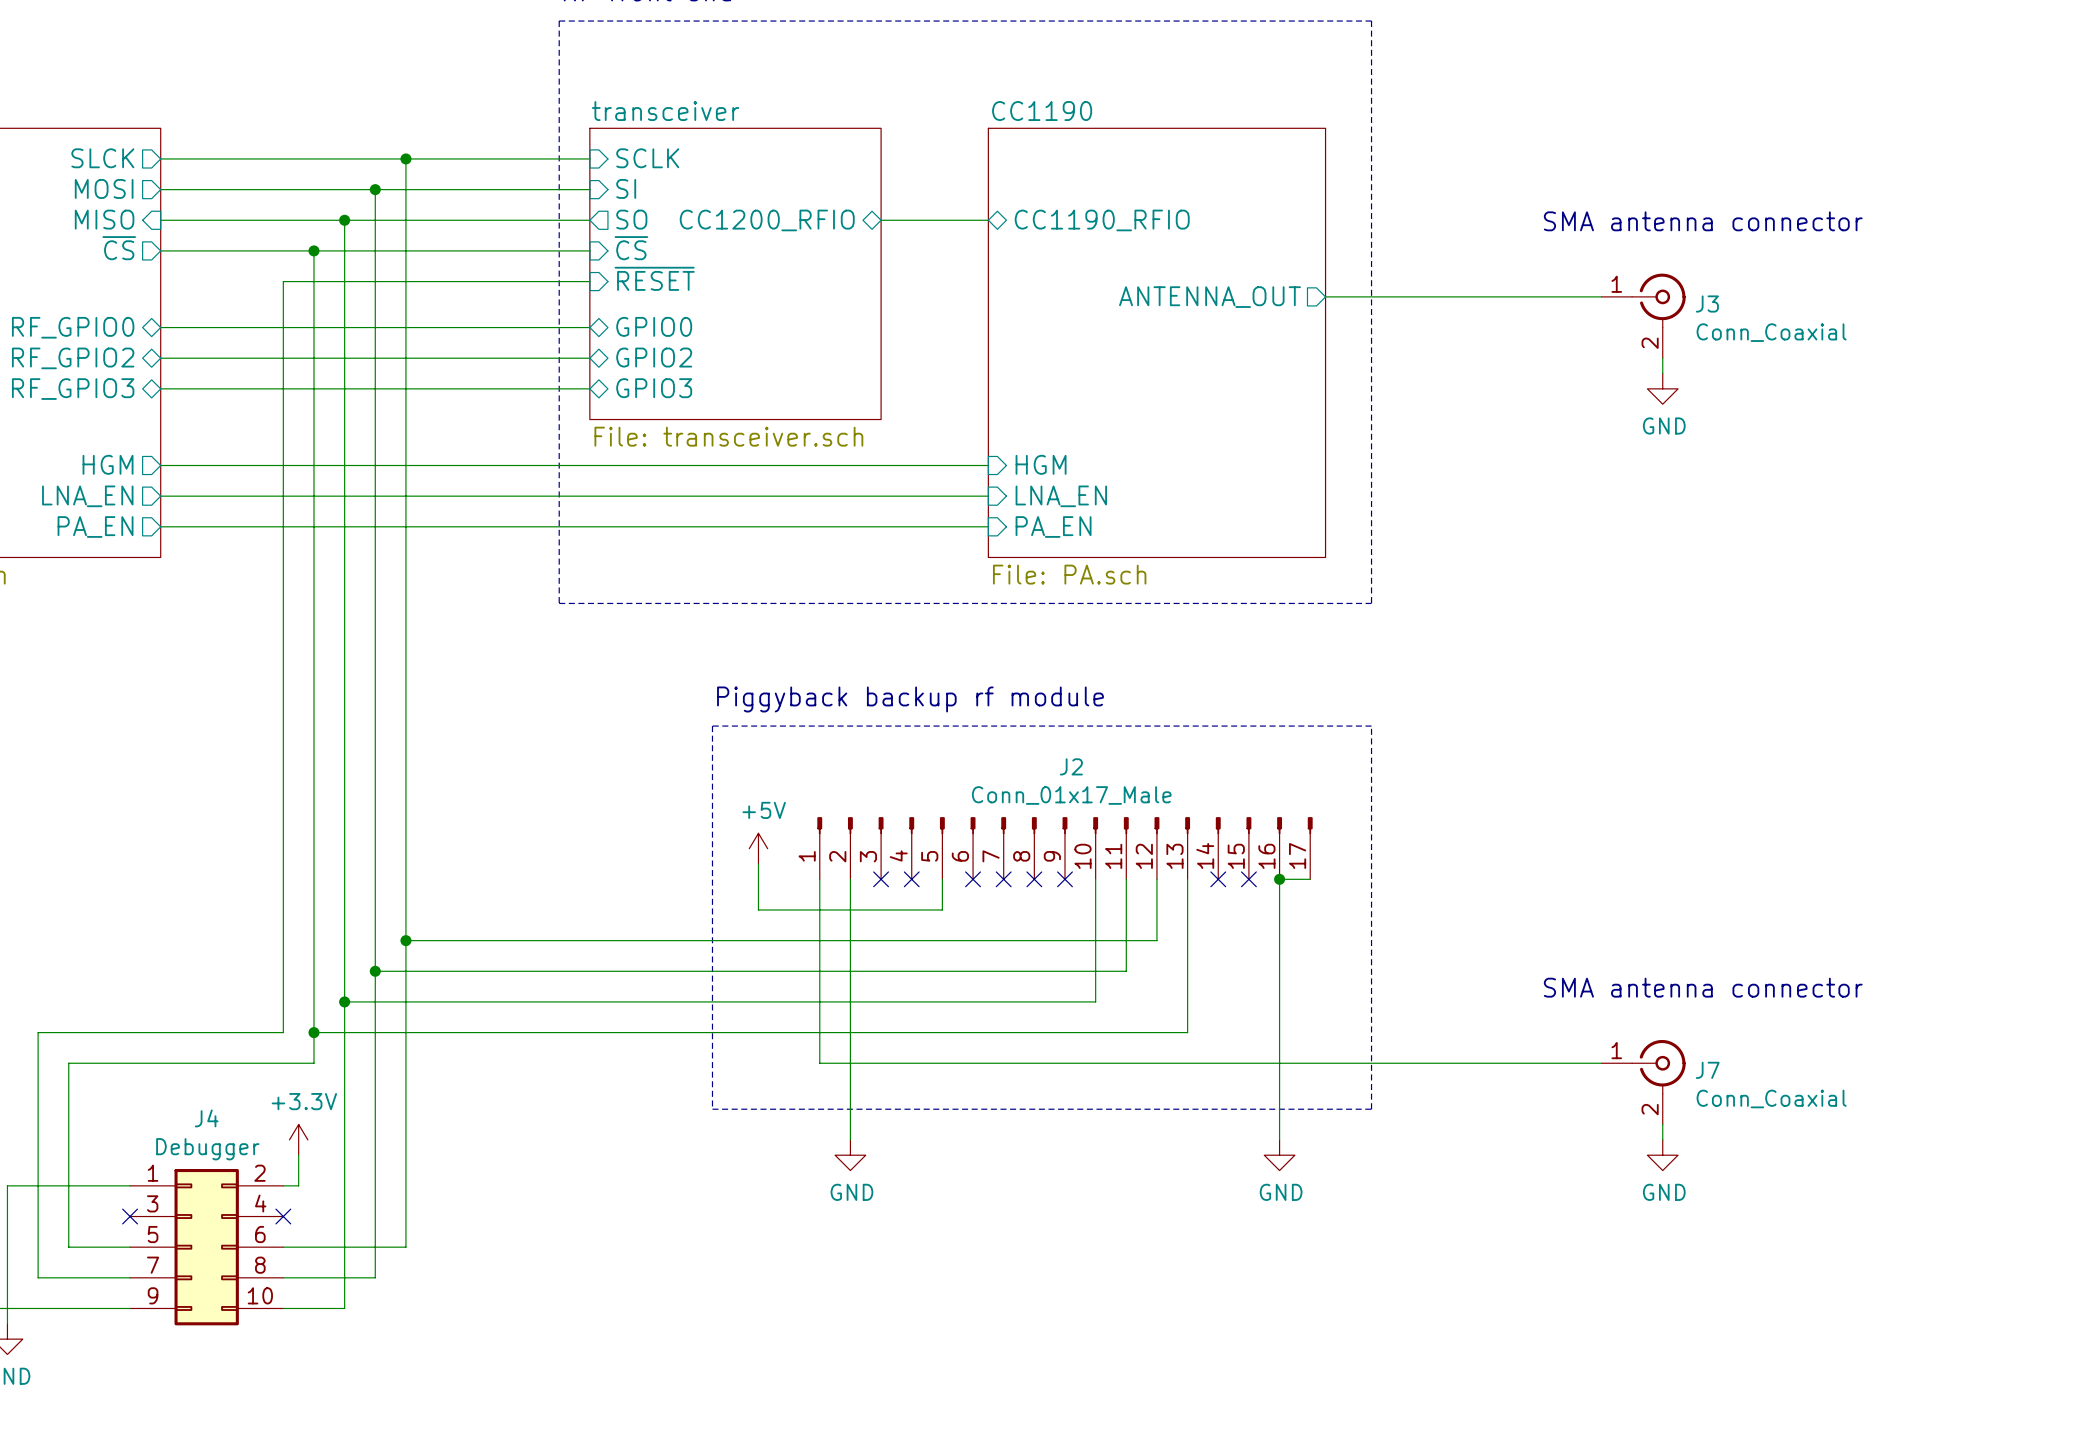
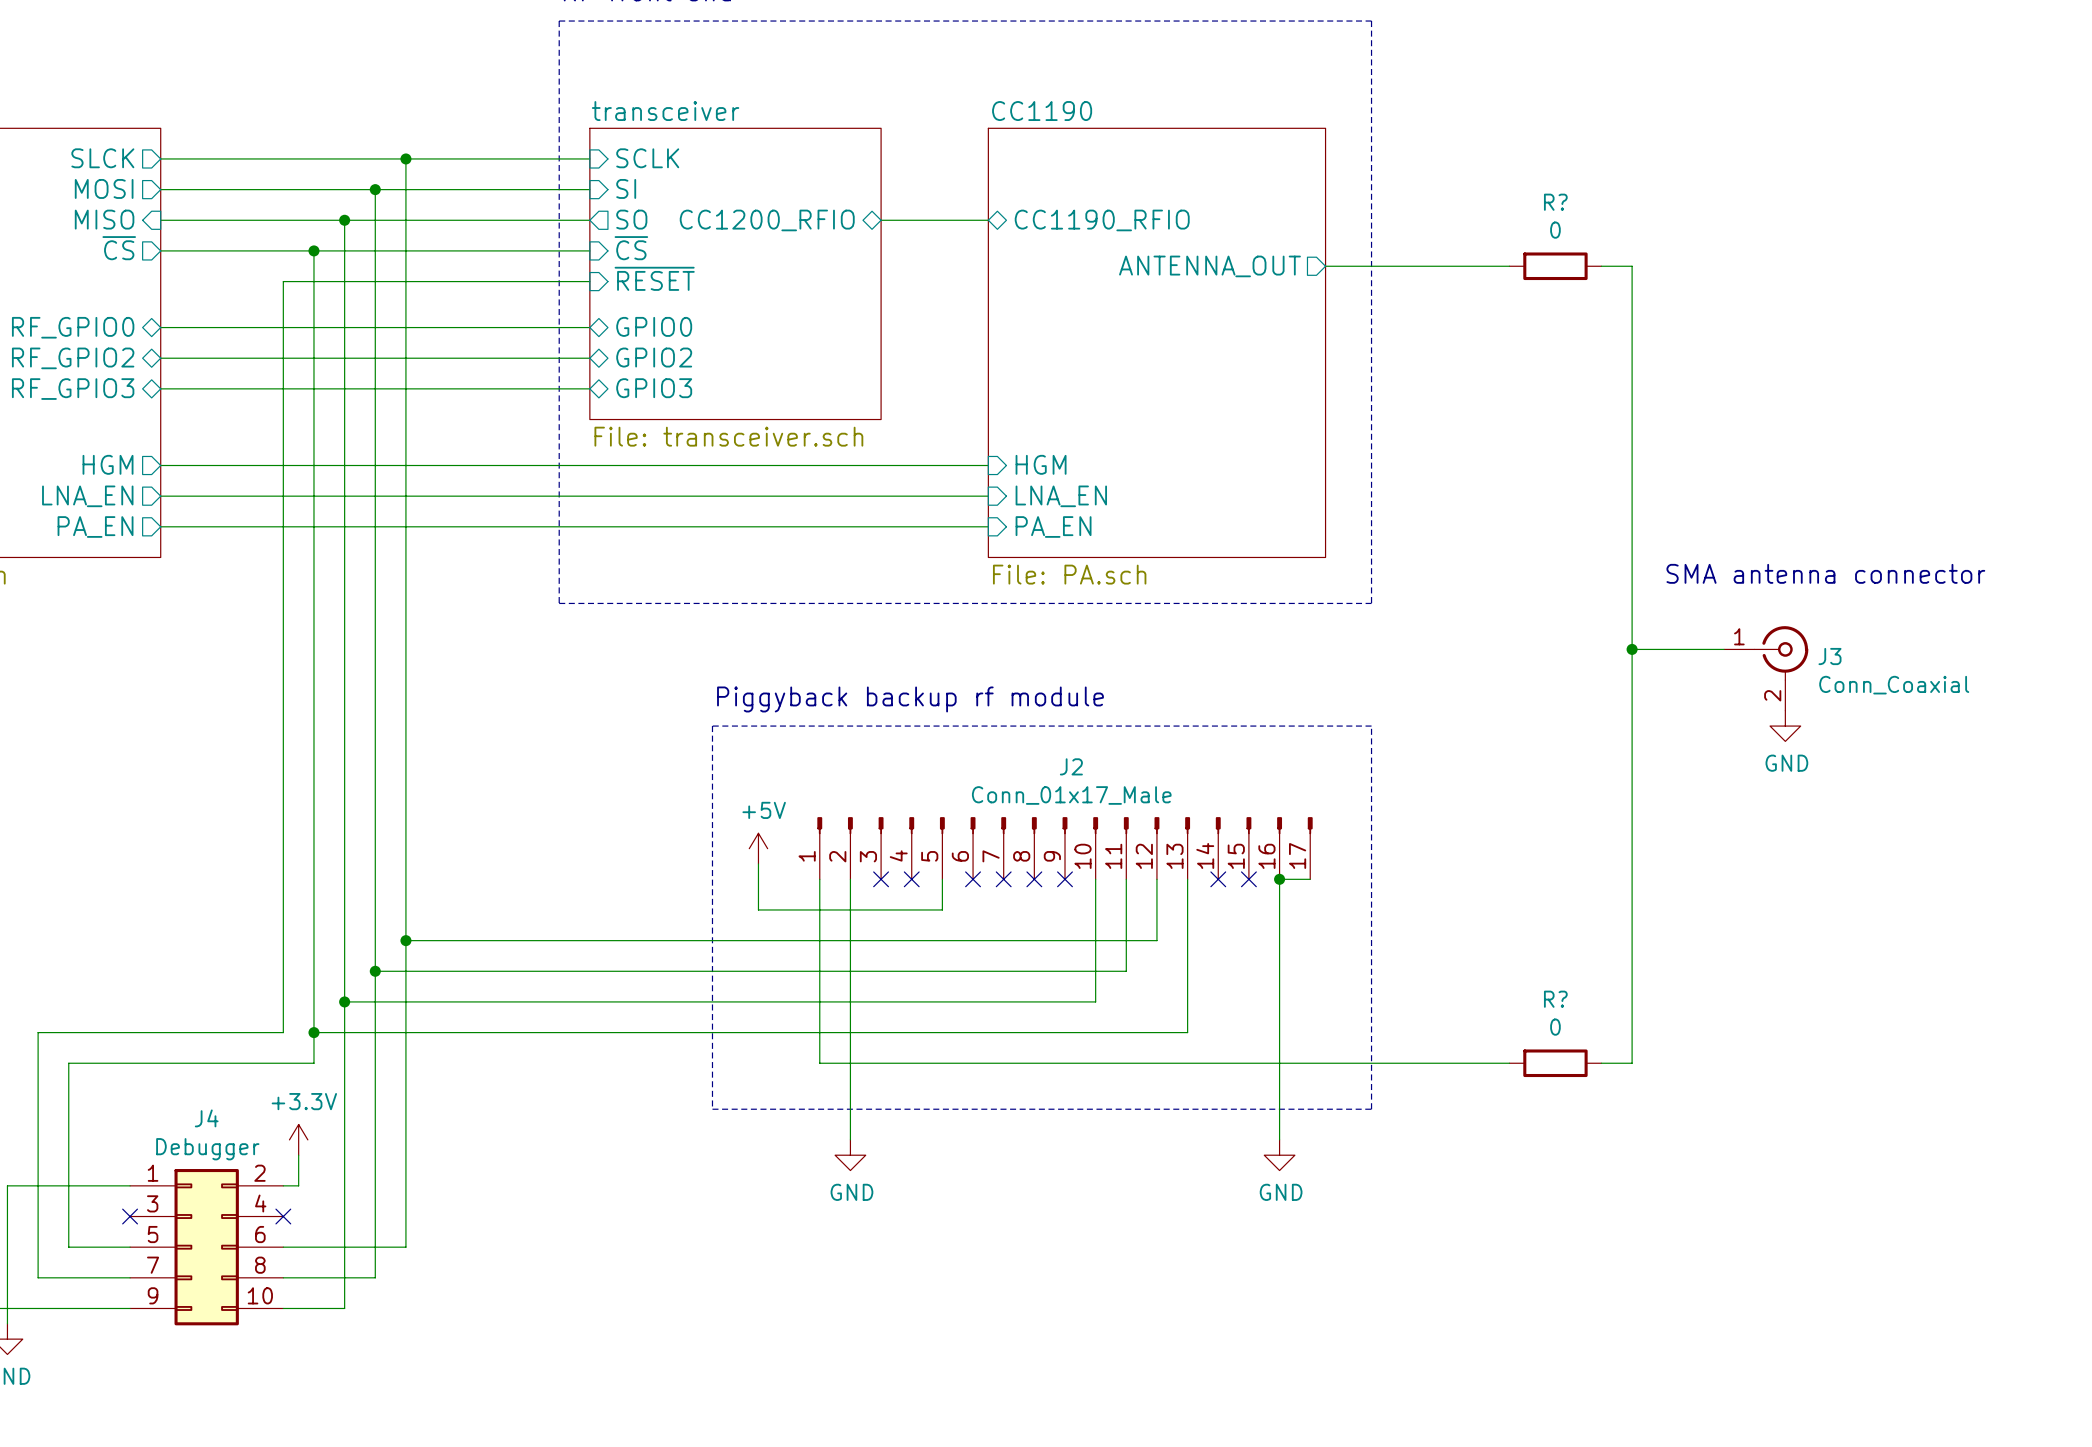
text: SMA antenna connector (1703, 221) -> none
wire: none -> (1325, 266) (1509, 266)
R?: none -> 0 (1555, 266)
wire: (1325, 296) (1601, 296) -> none
sheet pin position: ANTENNA_OUT (1209, 297) -> ANTENNA_OUT (1209, 266)
J3 position: (1643, 315) -> (1766, 668)
wire: (1662, 358) (1662, 373) -> none
power symbol: GND (1662, 388) -> none
text: none -> SMA antenna connector (1825, 573)
wire: none -> (1632, 649) (1724, 649)
junction: none -> (1632, 649)
power symbol: none -> GND (1785, 726)
text: SMA antenna connector (1703, 987) -> none
wire: (1509, 1063) (1601, 1063) -> (1601, 266) (1632, 266) (1632, 1063) (1601, 1063)
R?: none -> 0 (1555, 1063)
J7: Conn_Coaxial (1643, 1082) -> none
wire: (1662, 1124) (1662, 1139) -> none
power symbol: GND (1662, 1155) -> none

